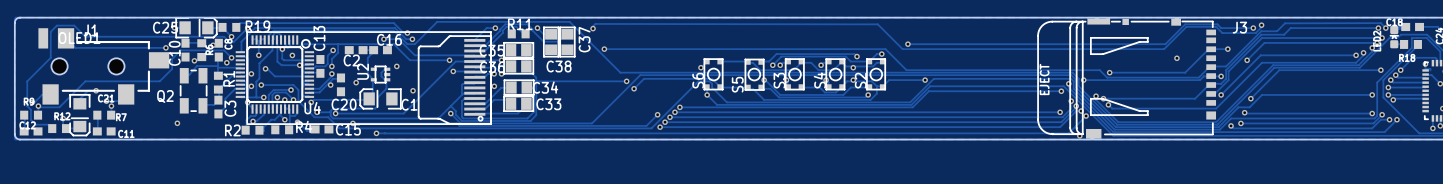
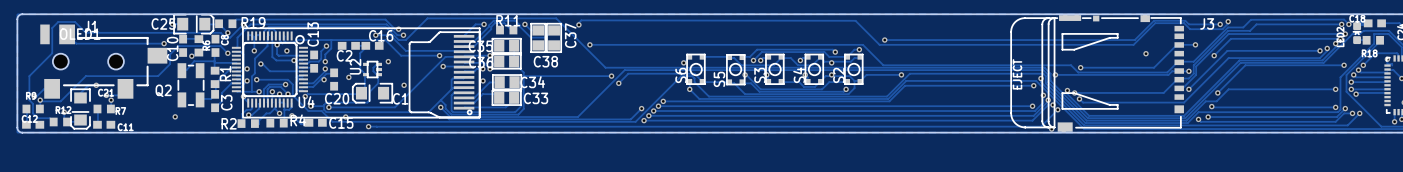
via: (213, 45) -> none
via: (226, 62) -> none

